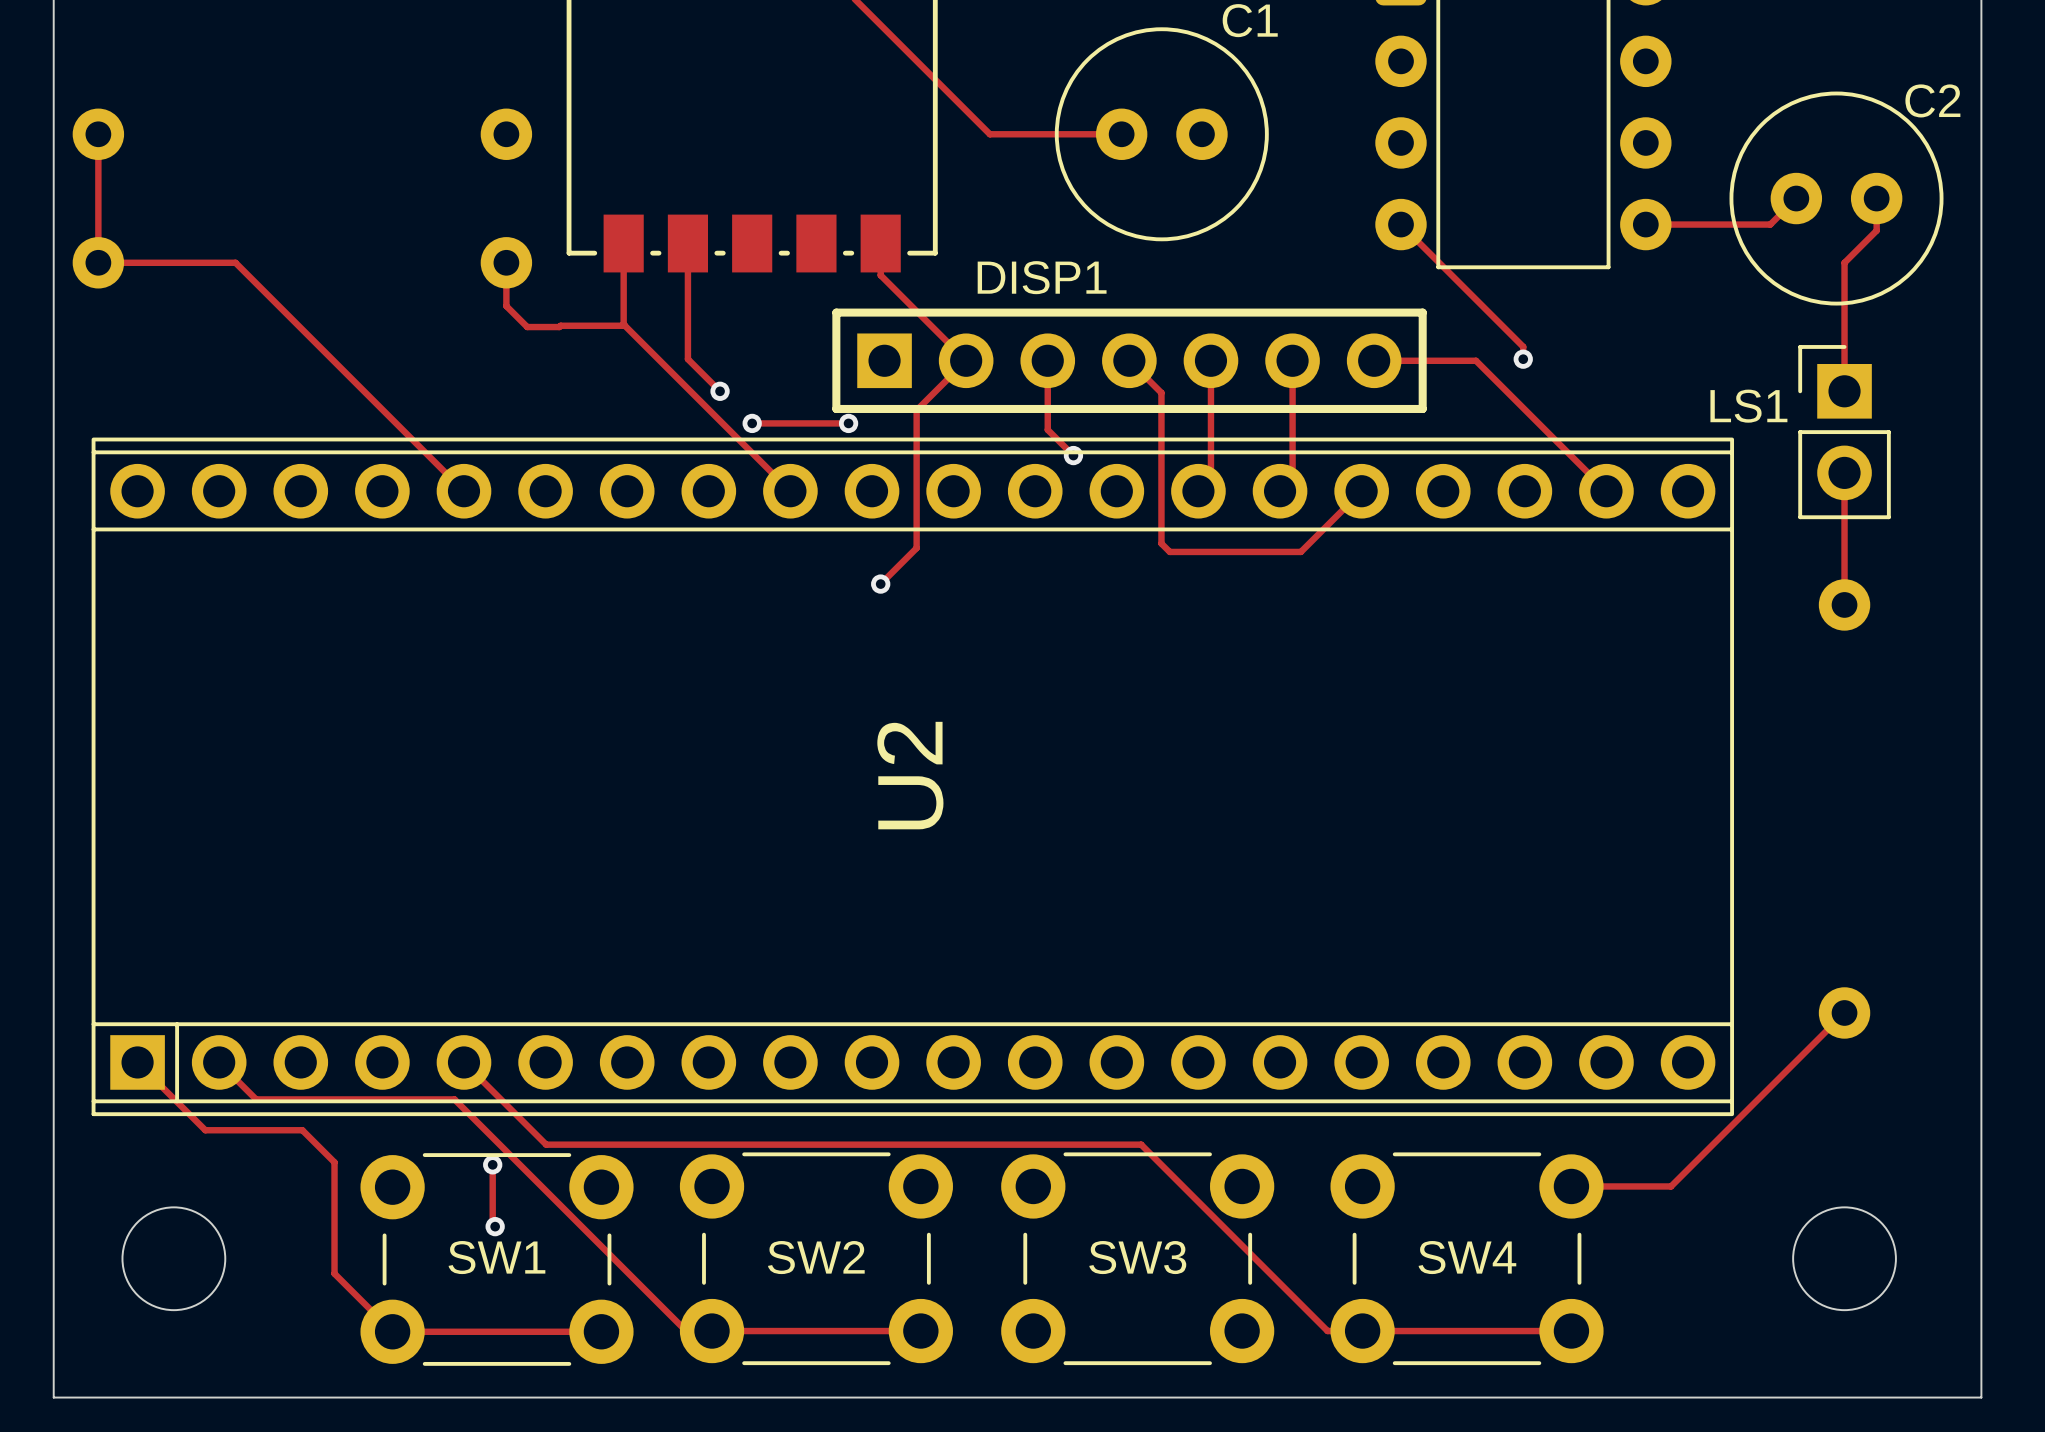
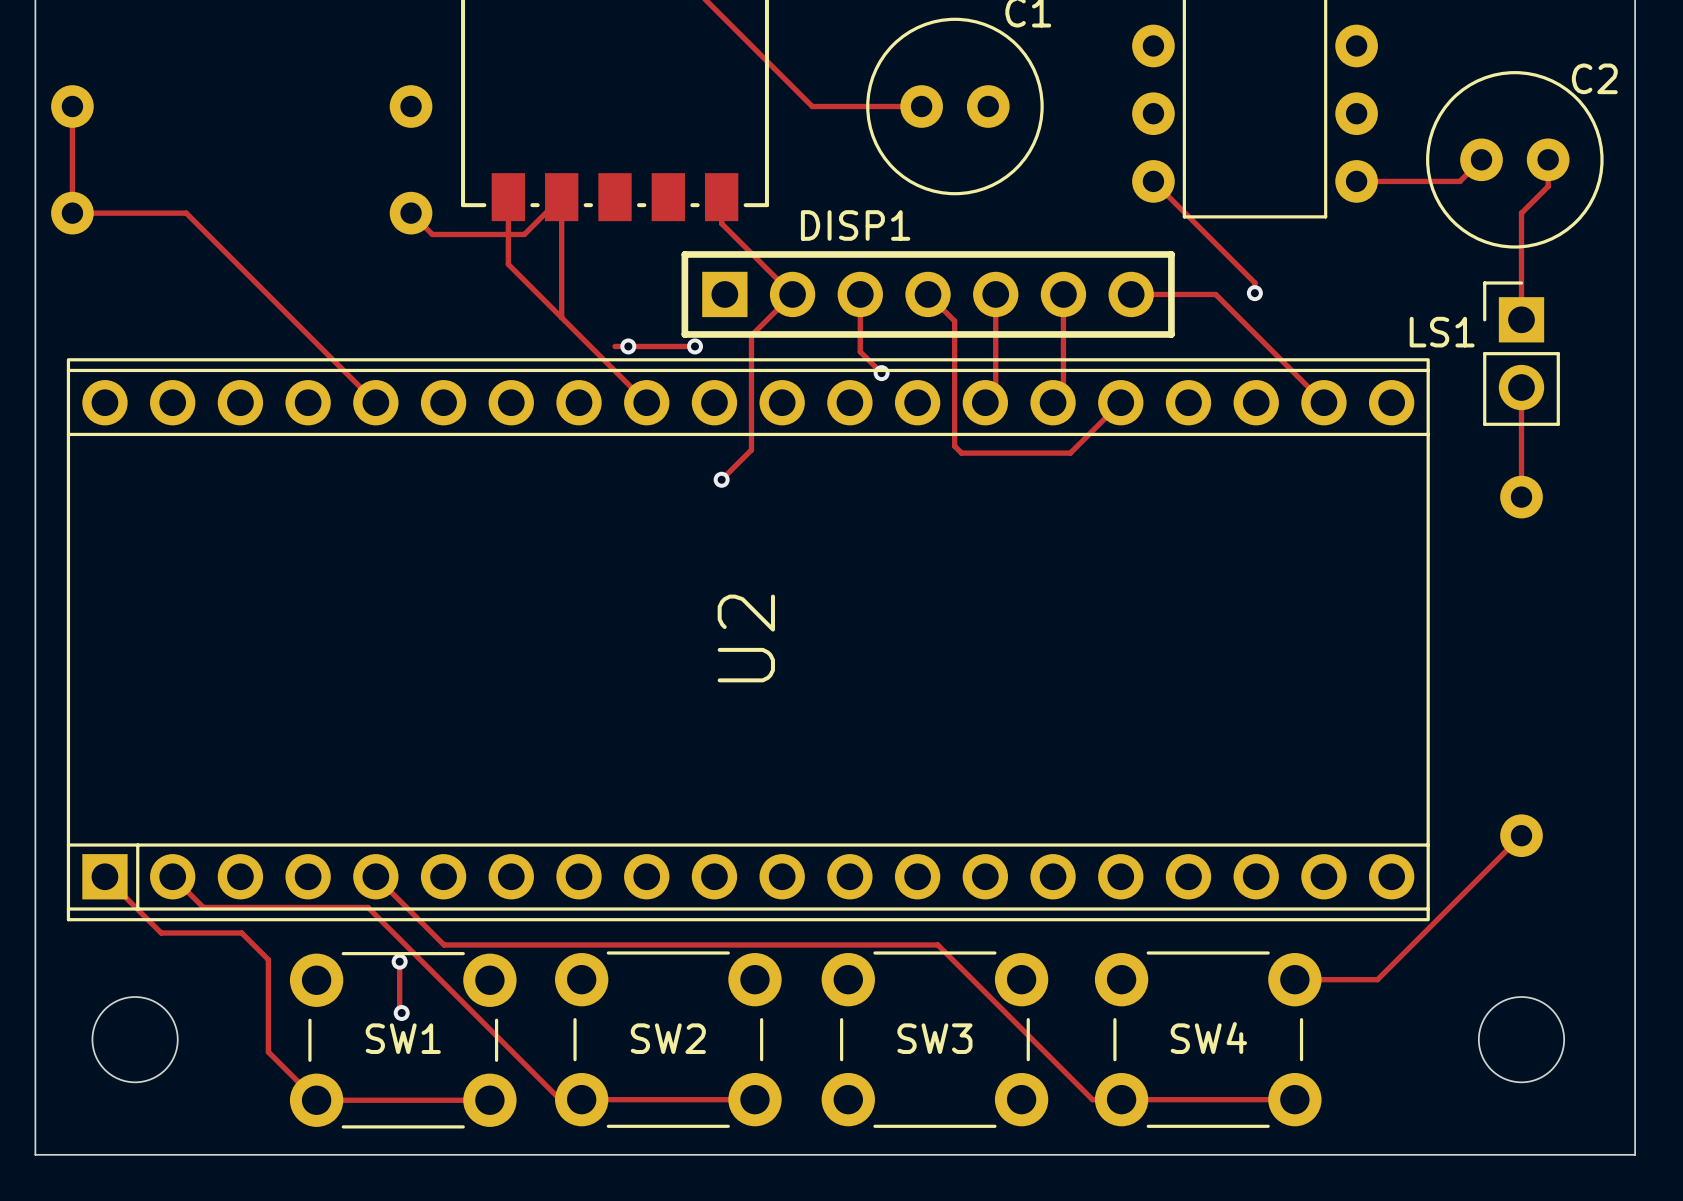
track: (506, 262) (506, 306) (527, 327) (624, 325) -> (411, 213) (432, 234) (524, 234) (561, 197)
track: (687, 359) (720, 391) -> (561, 293) (561, 317)
via: (720, 391) -> none
via position: (752, 423) -> (628, 346)

